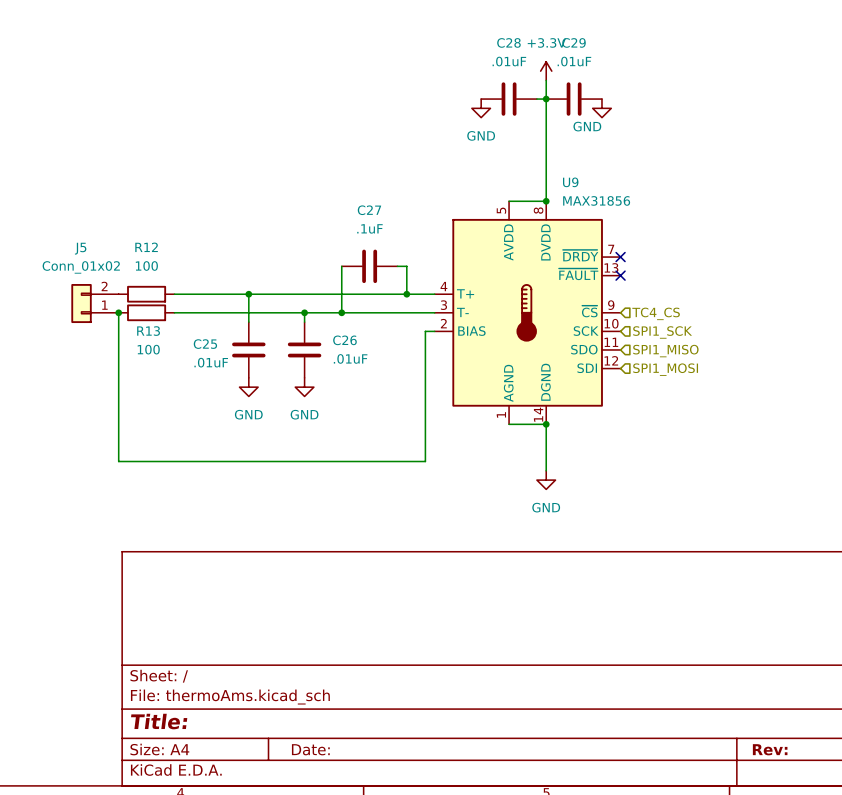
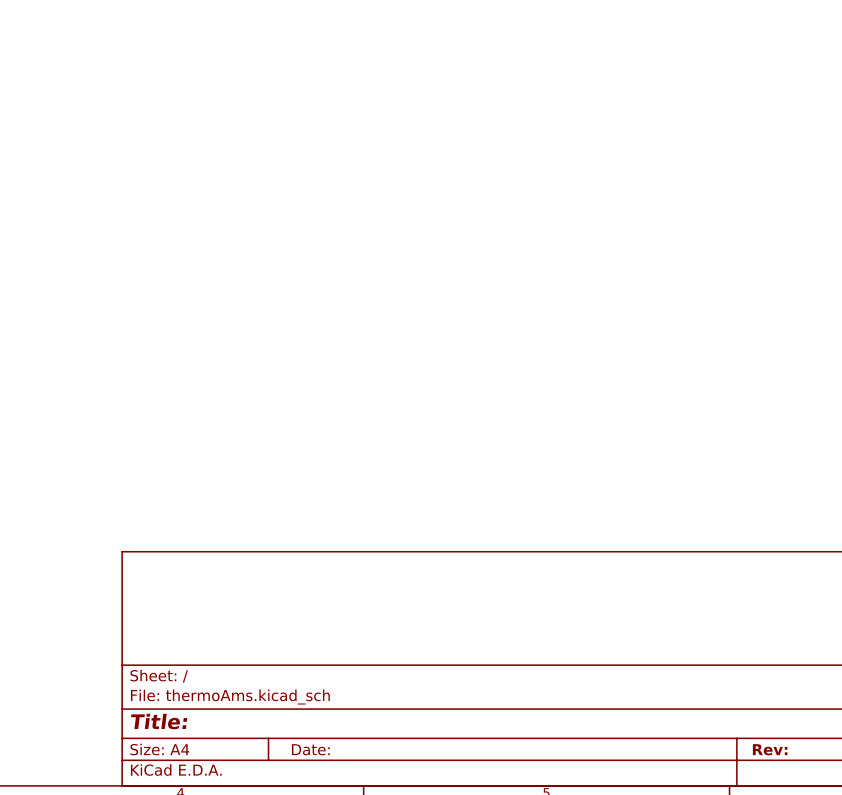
power symbol: +3.3V (546, 71) -> none
wire: (546, 80) (546, 201) (509, 201) -> none
C28: .01uF (509, 99) -> none
wire: (536, 99) (546, 99) -> none
junction: (546, 99) -> none
C29: .01uF (574, 99) -> none
power symbol: GND (481, 108) -> none
power symbol: GND (601, 108) -> none
junction: (546, 201) -> none
no-connect mark: (620, 257) -> none
wire: (341, 266) (341, 312) -> none
C27: .1uF (369, 266) -> none
wire: (397, 266) (406, 266) (406, 294) -> none
no-connect mark: (620, 275) -> none
R12: 100 (146, 294) -> none
wire: (174, 294) (434, 294) -> none
wire: (248, 294) (248, 322) -> none
junction: (248, 294) -> none
junction: (406, 294) -> none
J5: Conn_01x02 (95, 303) -> none
wire: (118, 312) (118, 461) (425, 461) (425, 331) (434, 331) -> none
junction: (118, 312) -> none
R13: 100 (146, 312) -> none
wire: (174, 312) (434, 312) -> none
wire: (304, 312) (304, 322) -> none
junction: (304, 312) -> none
junction: (341, 312) -> none
U9: MAX31856 (527, 312) -> none
hierarchical label: TC4_CS (656, 313) -> none
hierarchical label: SPI1_SCK (662, 332) -> none
C25: .01uF (248, 349) -> none
C26: .01uF (304, 349) -> none
hierarchical label: SPI1_MISO (665, 351) -> none
hierarchical label: SPI1_MOSI (665, 369) -> none
power symbol: GND (248, 387) -> none
power symbol: GND (304, 387) -> none
wire: (509, 424) (546, 424) (546, 470) -> none
junction: (546, 424) -> none
power symbol: GND (546, 480) -> none

